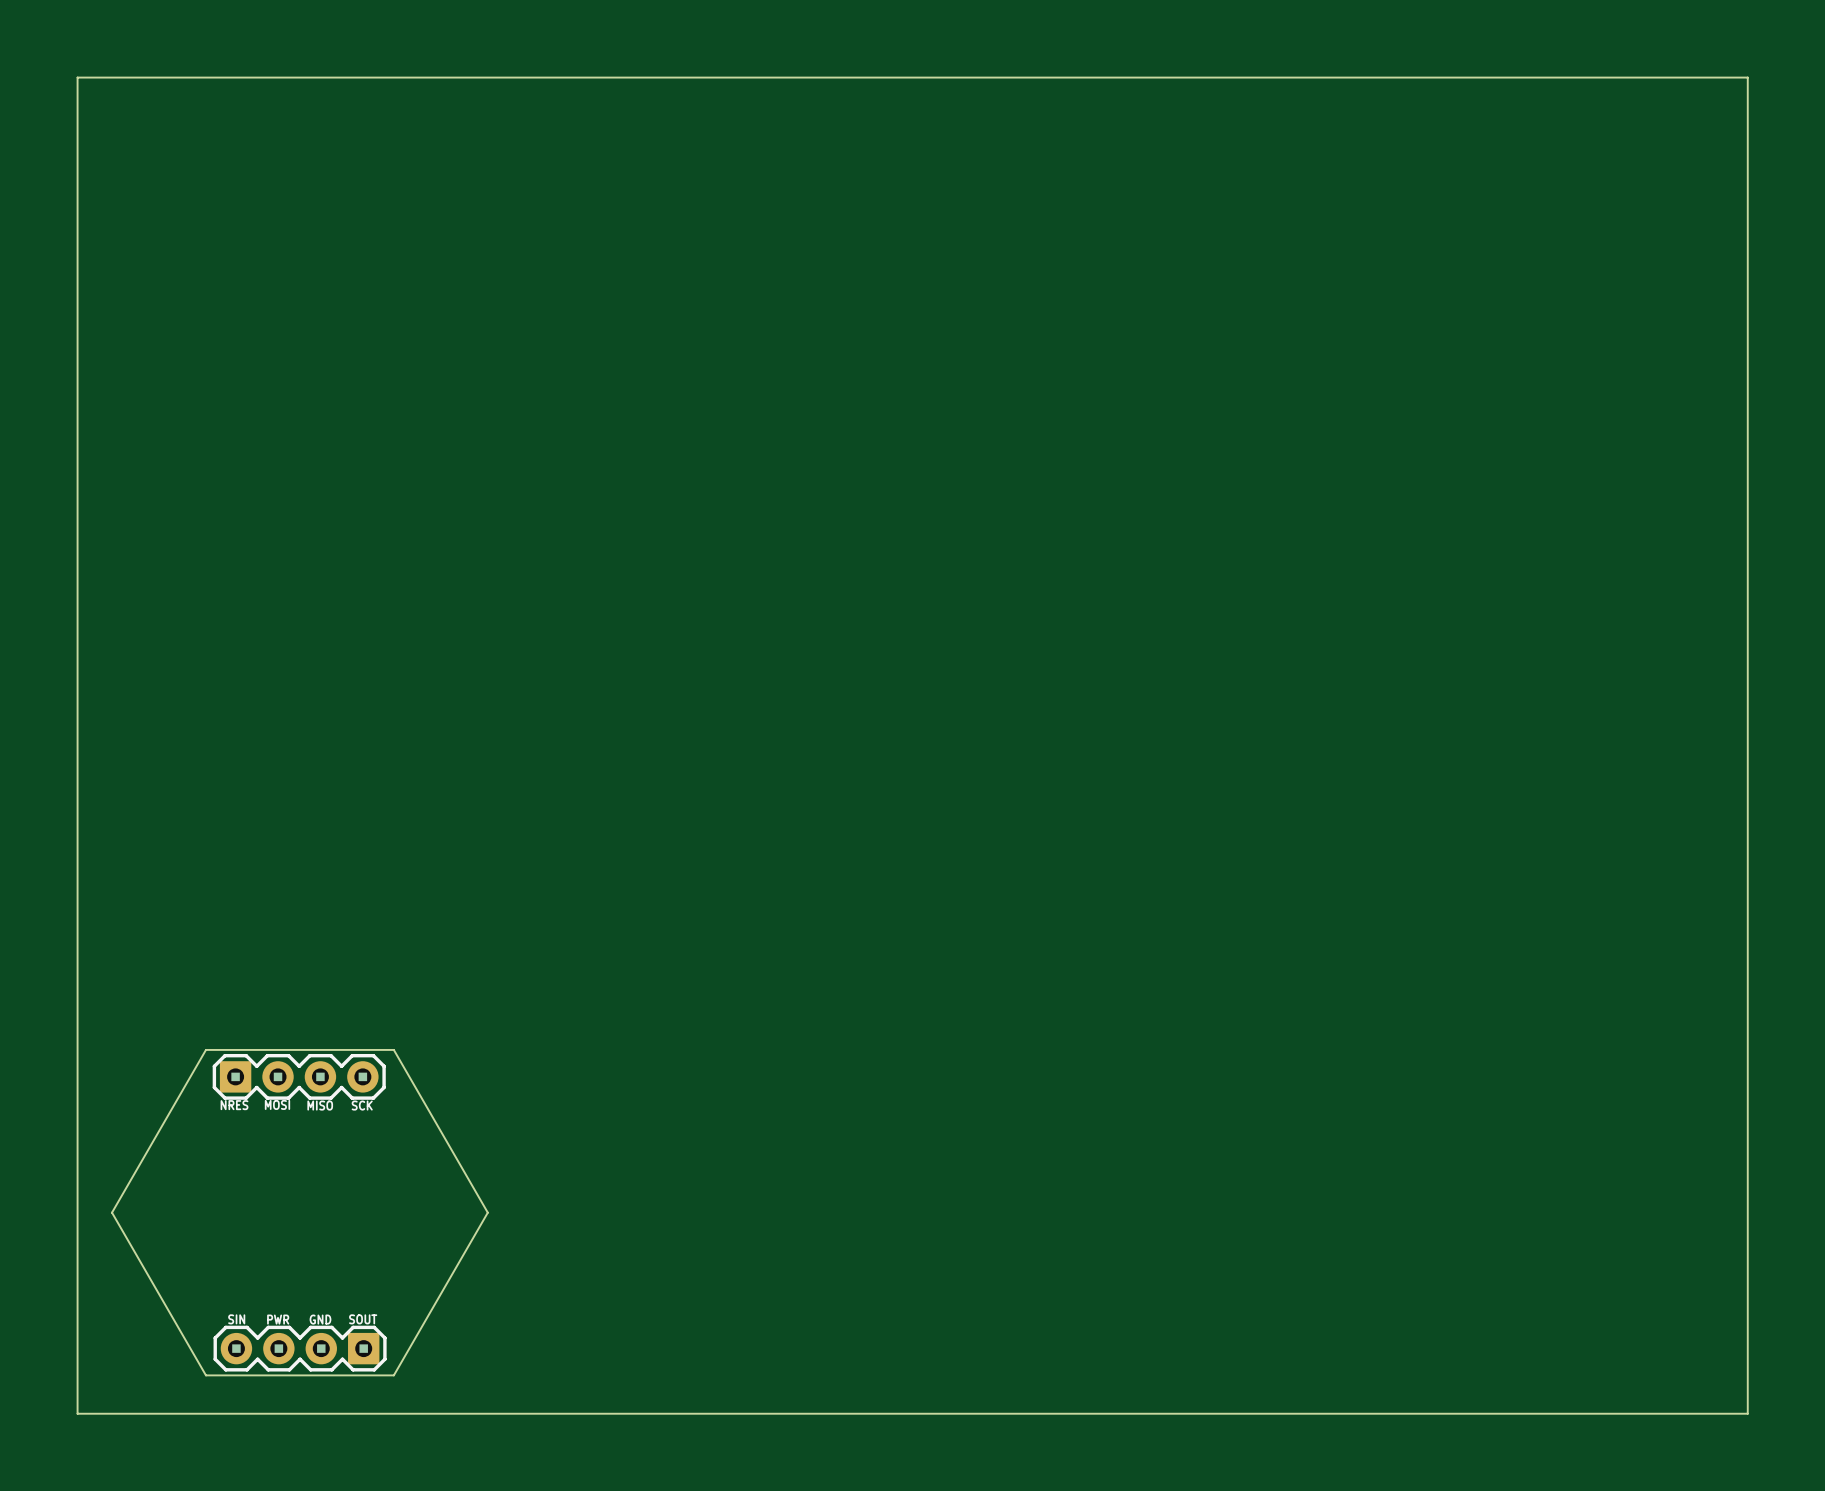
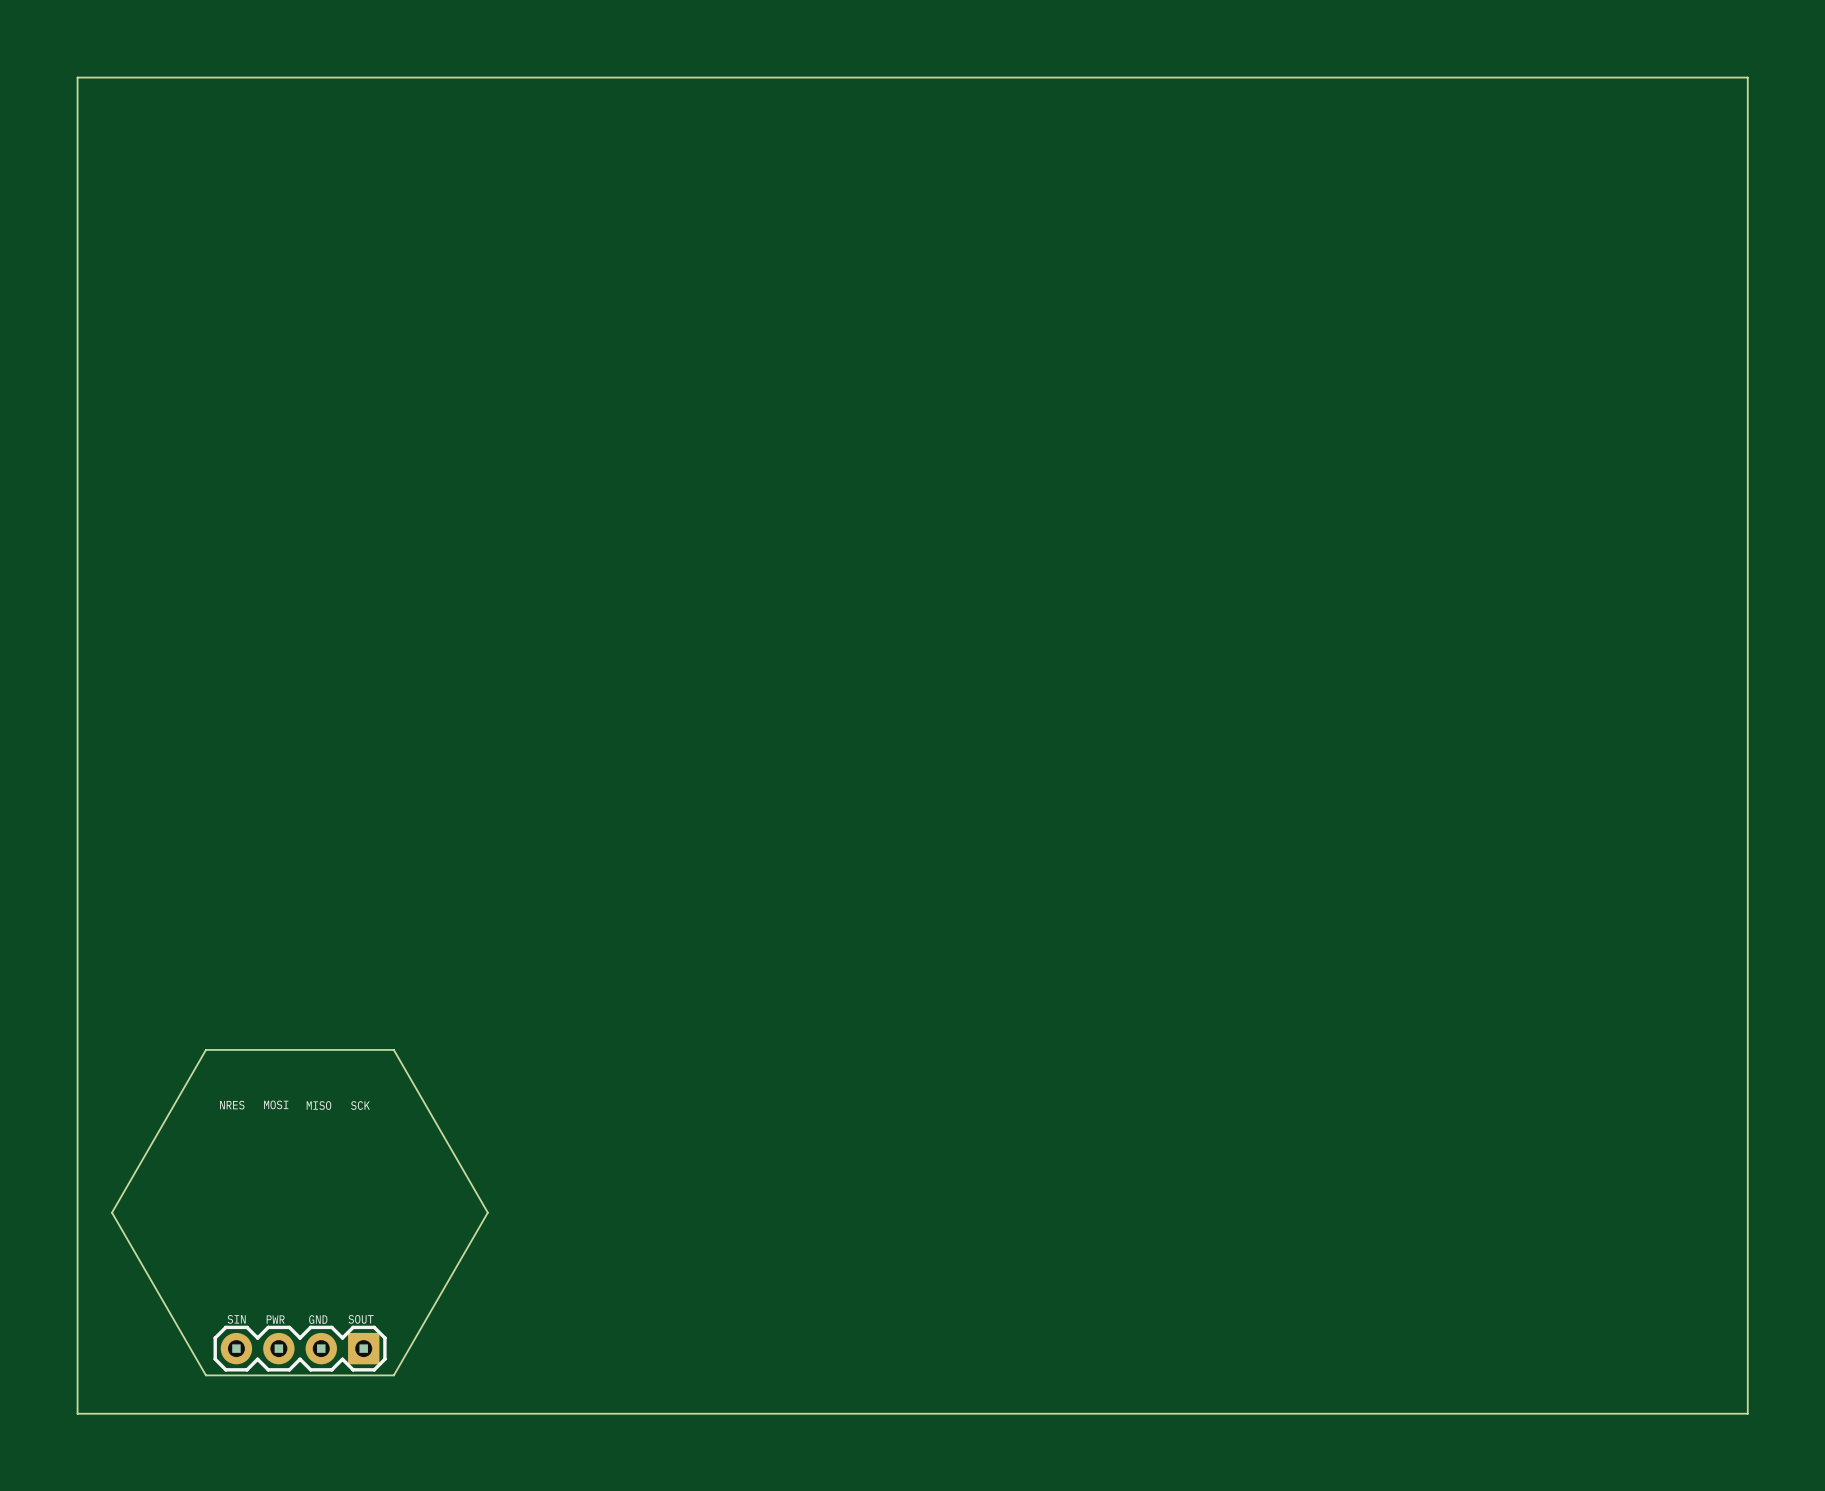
part: (299, 1076) -> none

